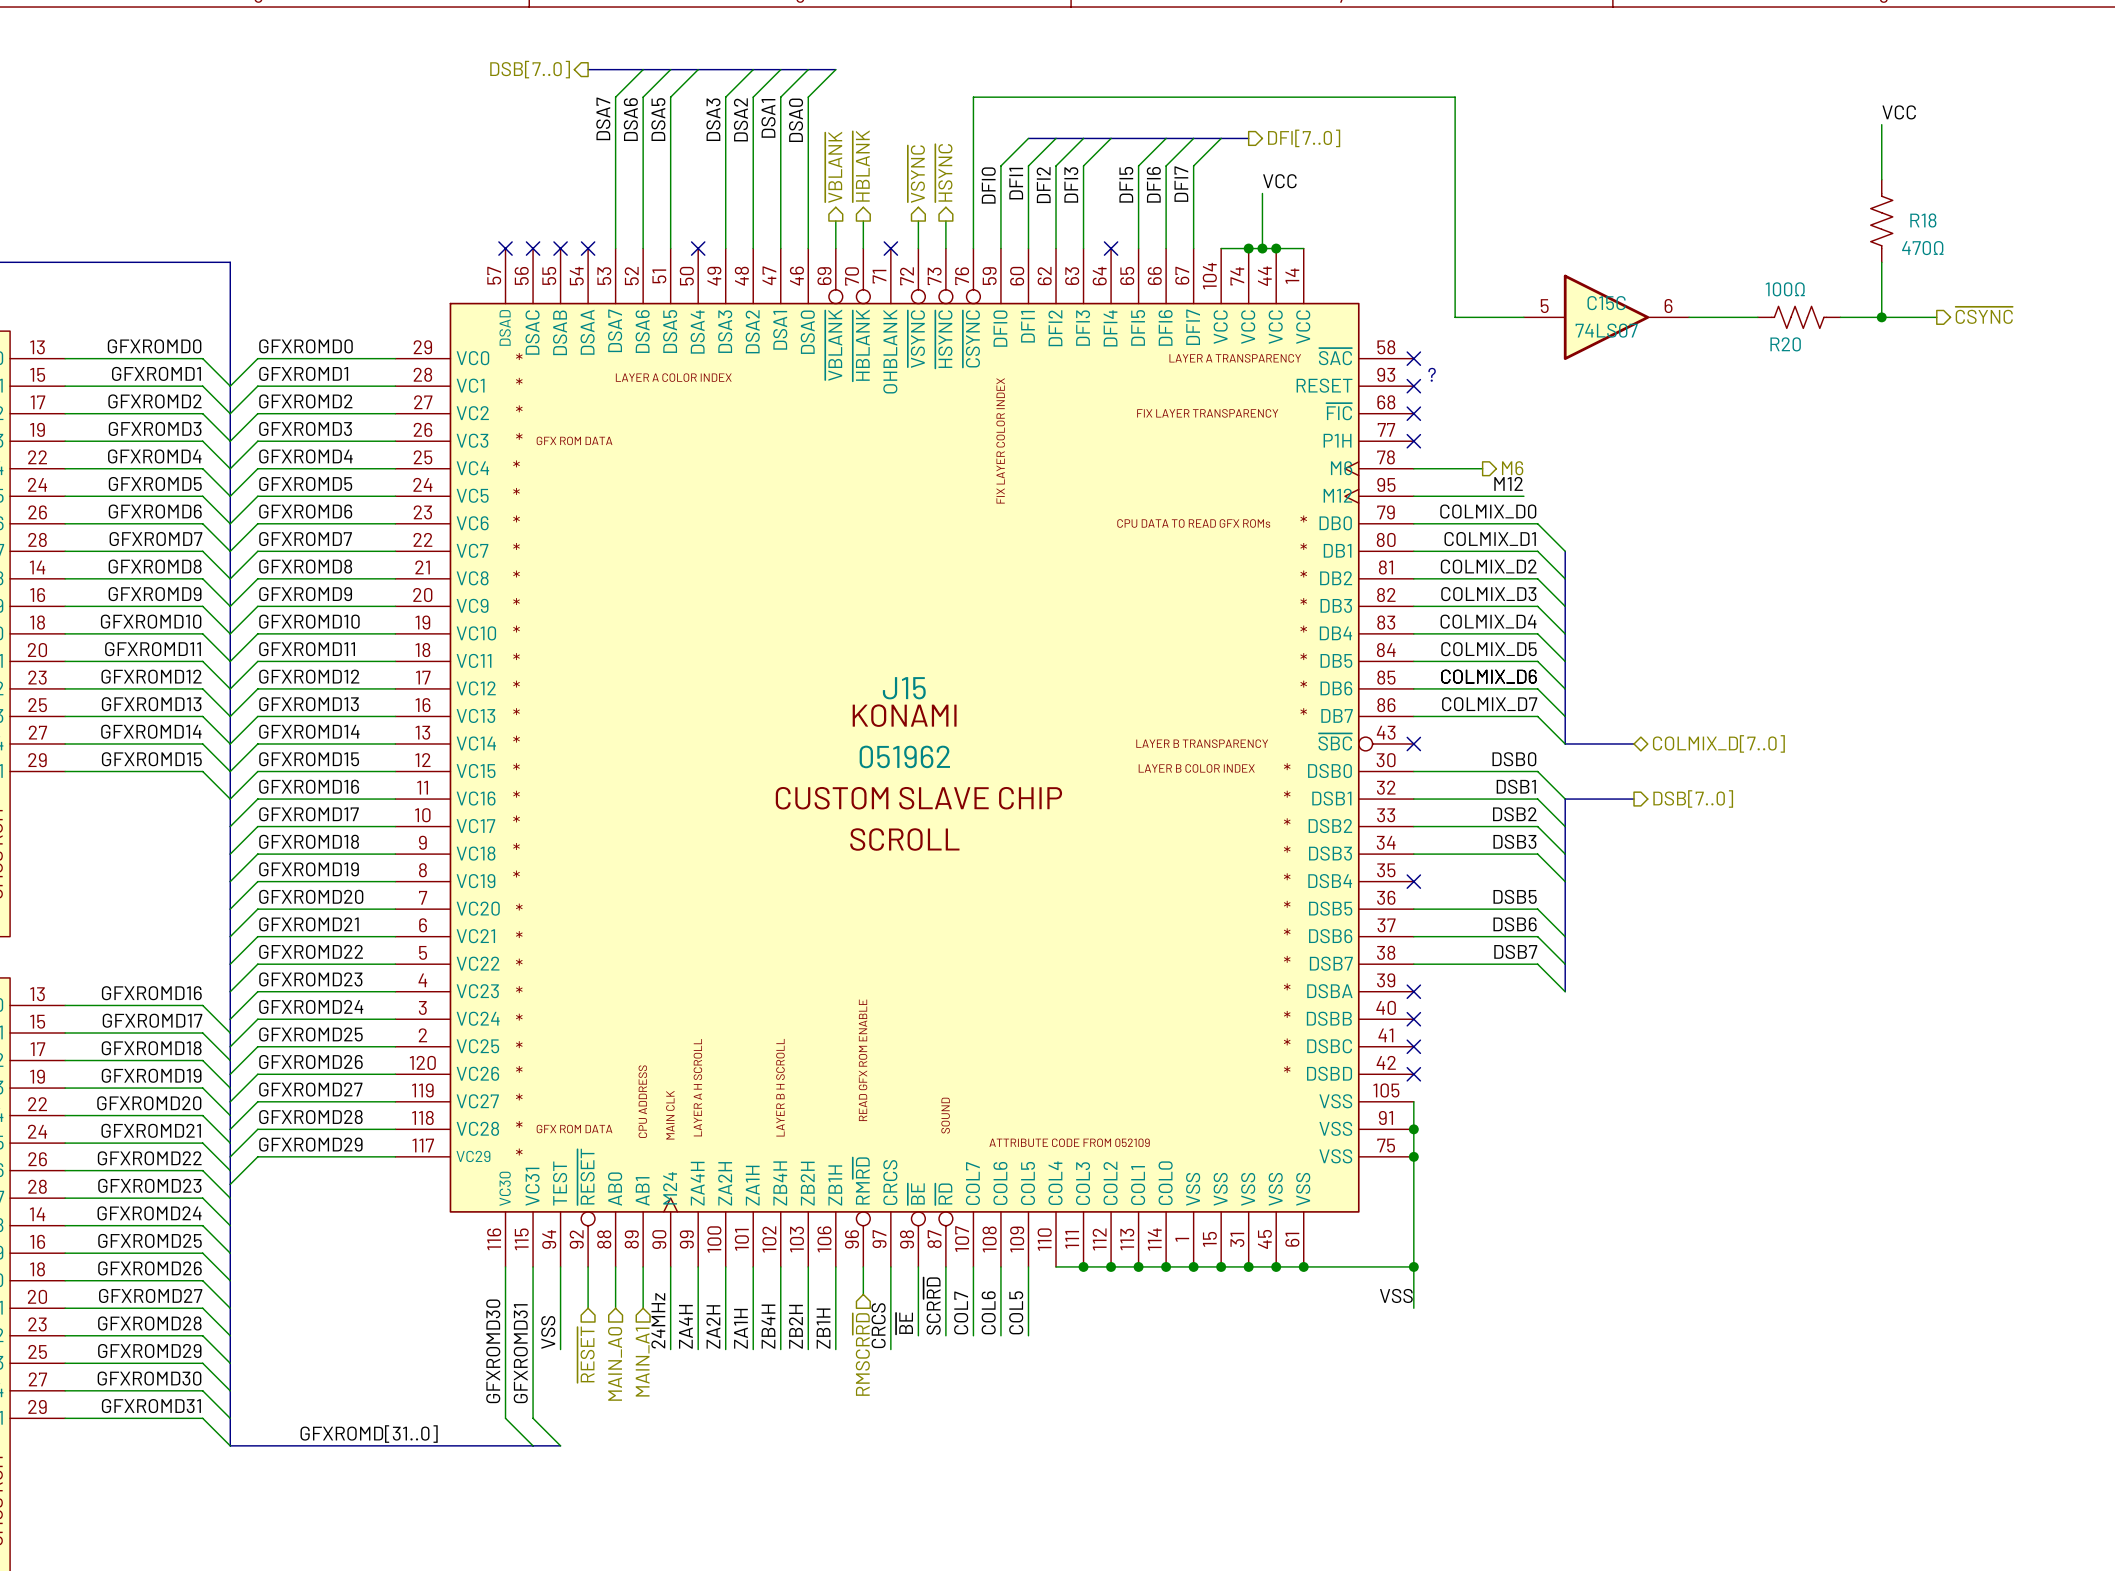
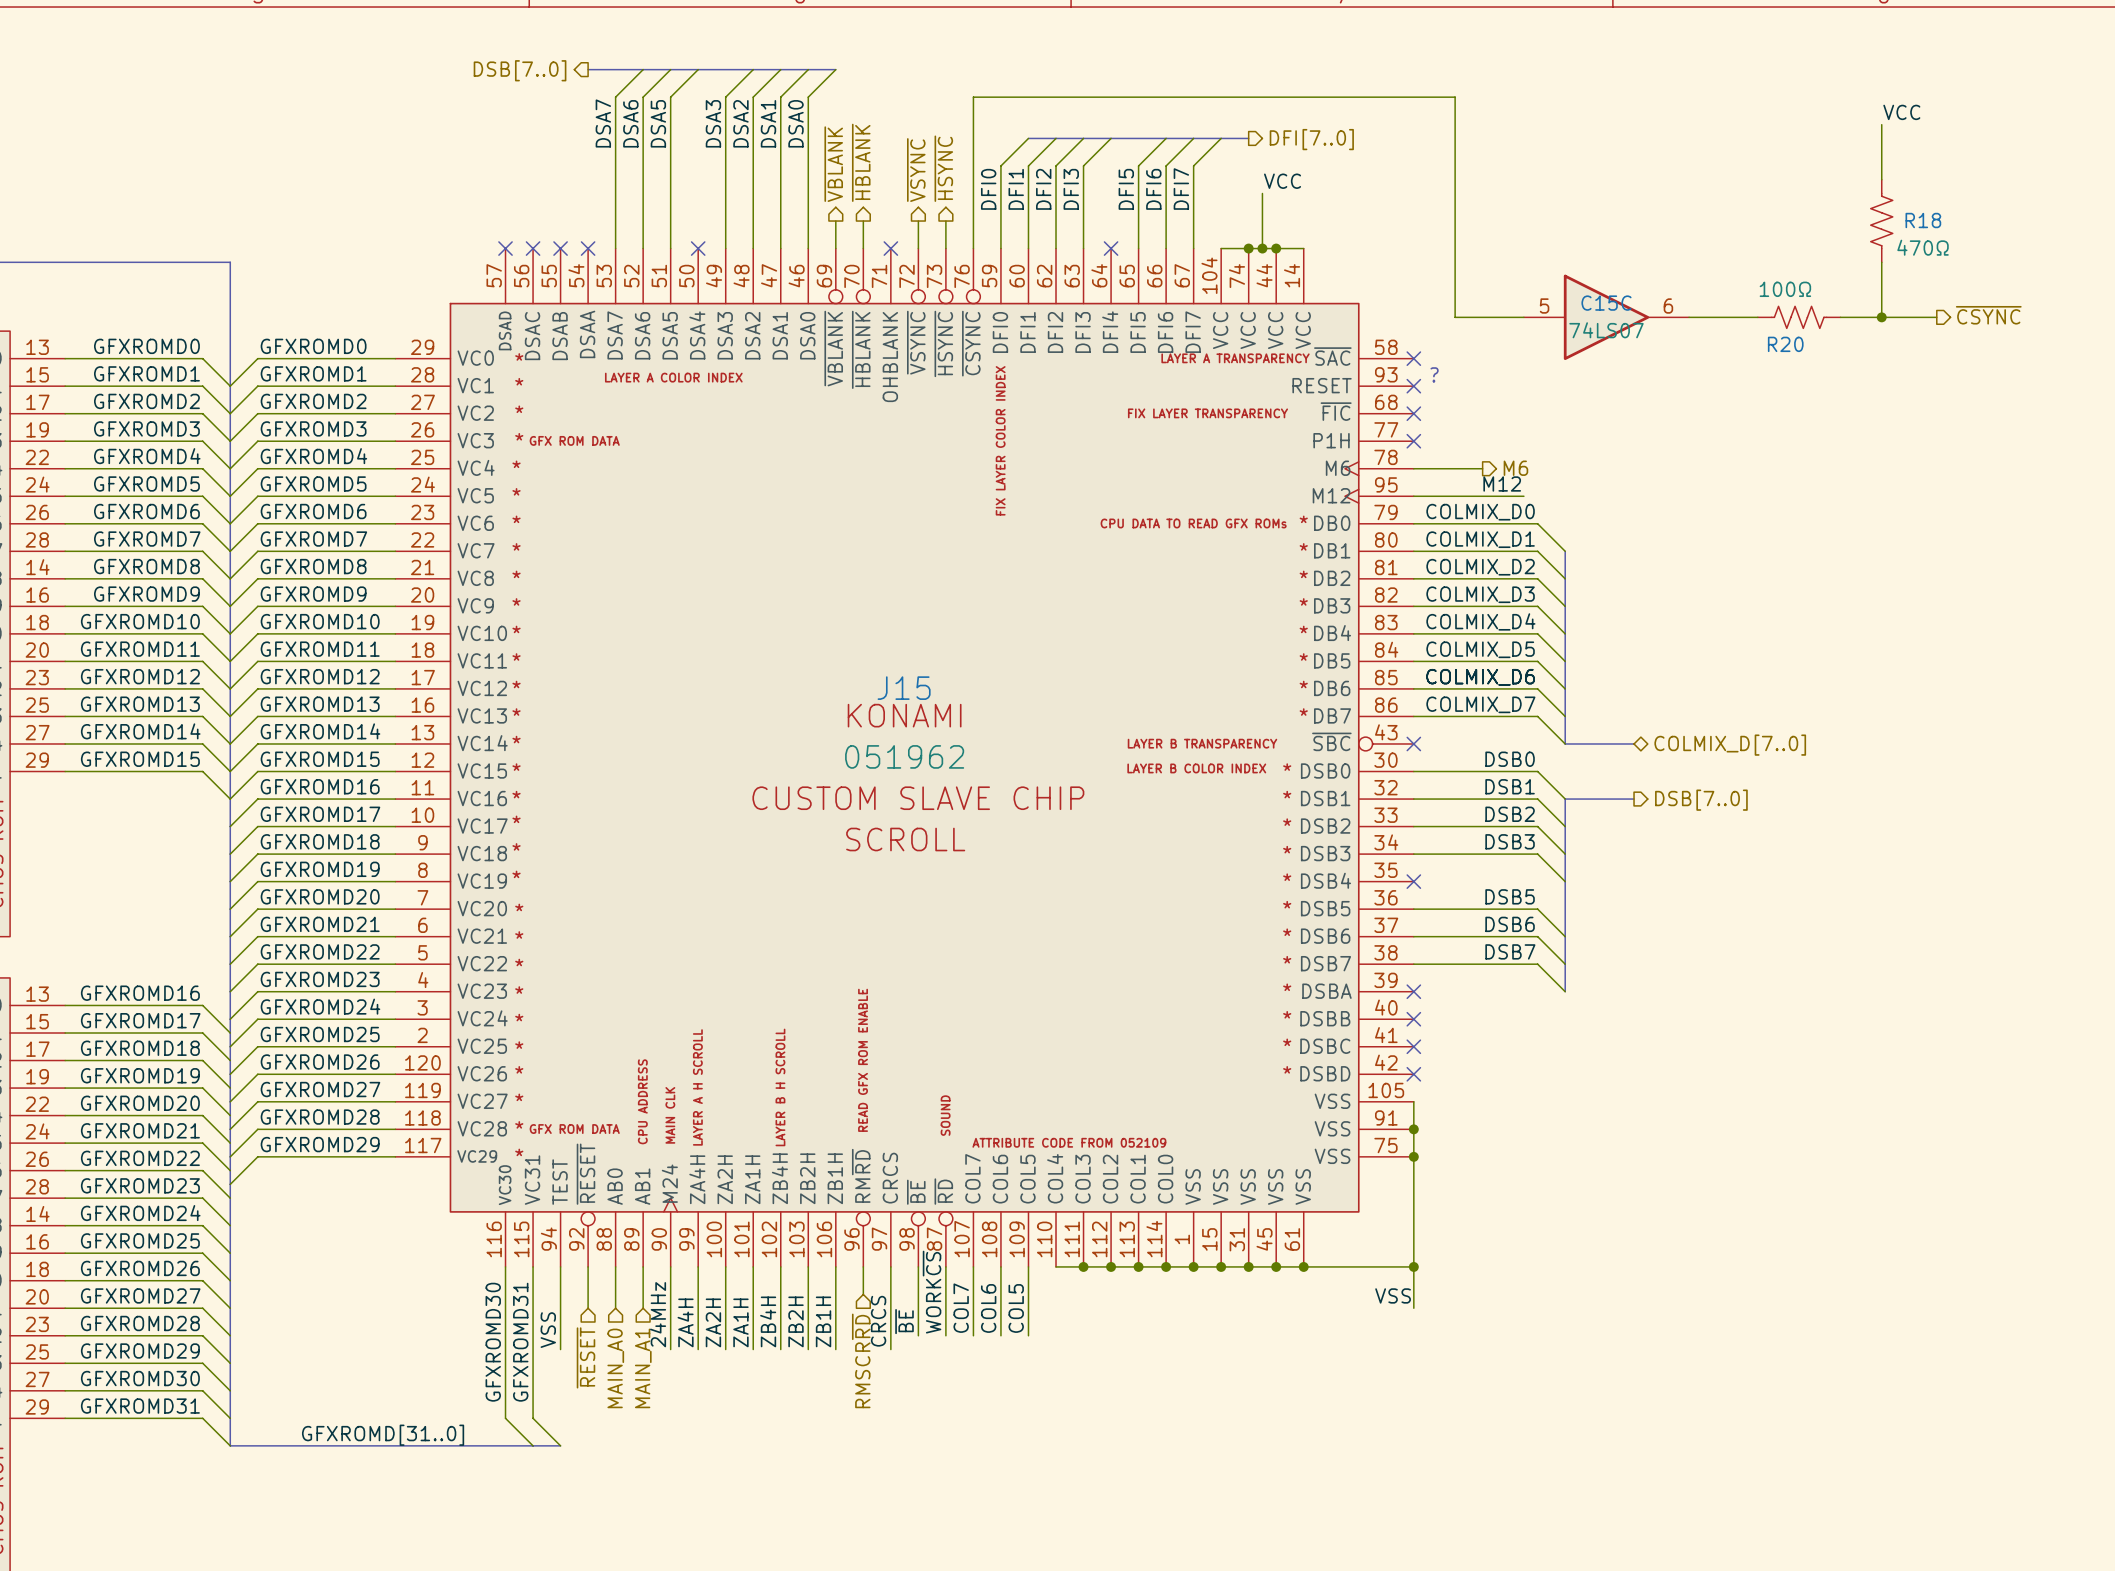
label: SCR~{RD} (932, 1306) -> WORK~{CS} (932, 1292)

